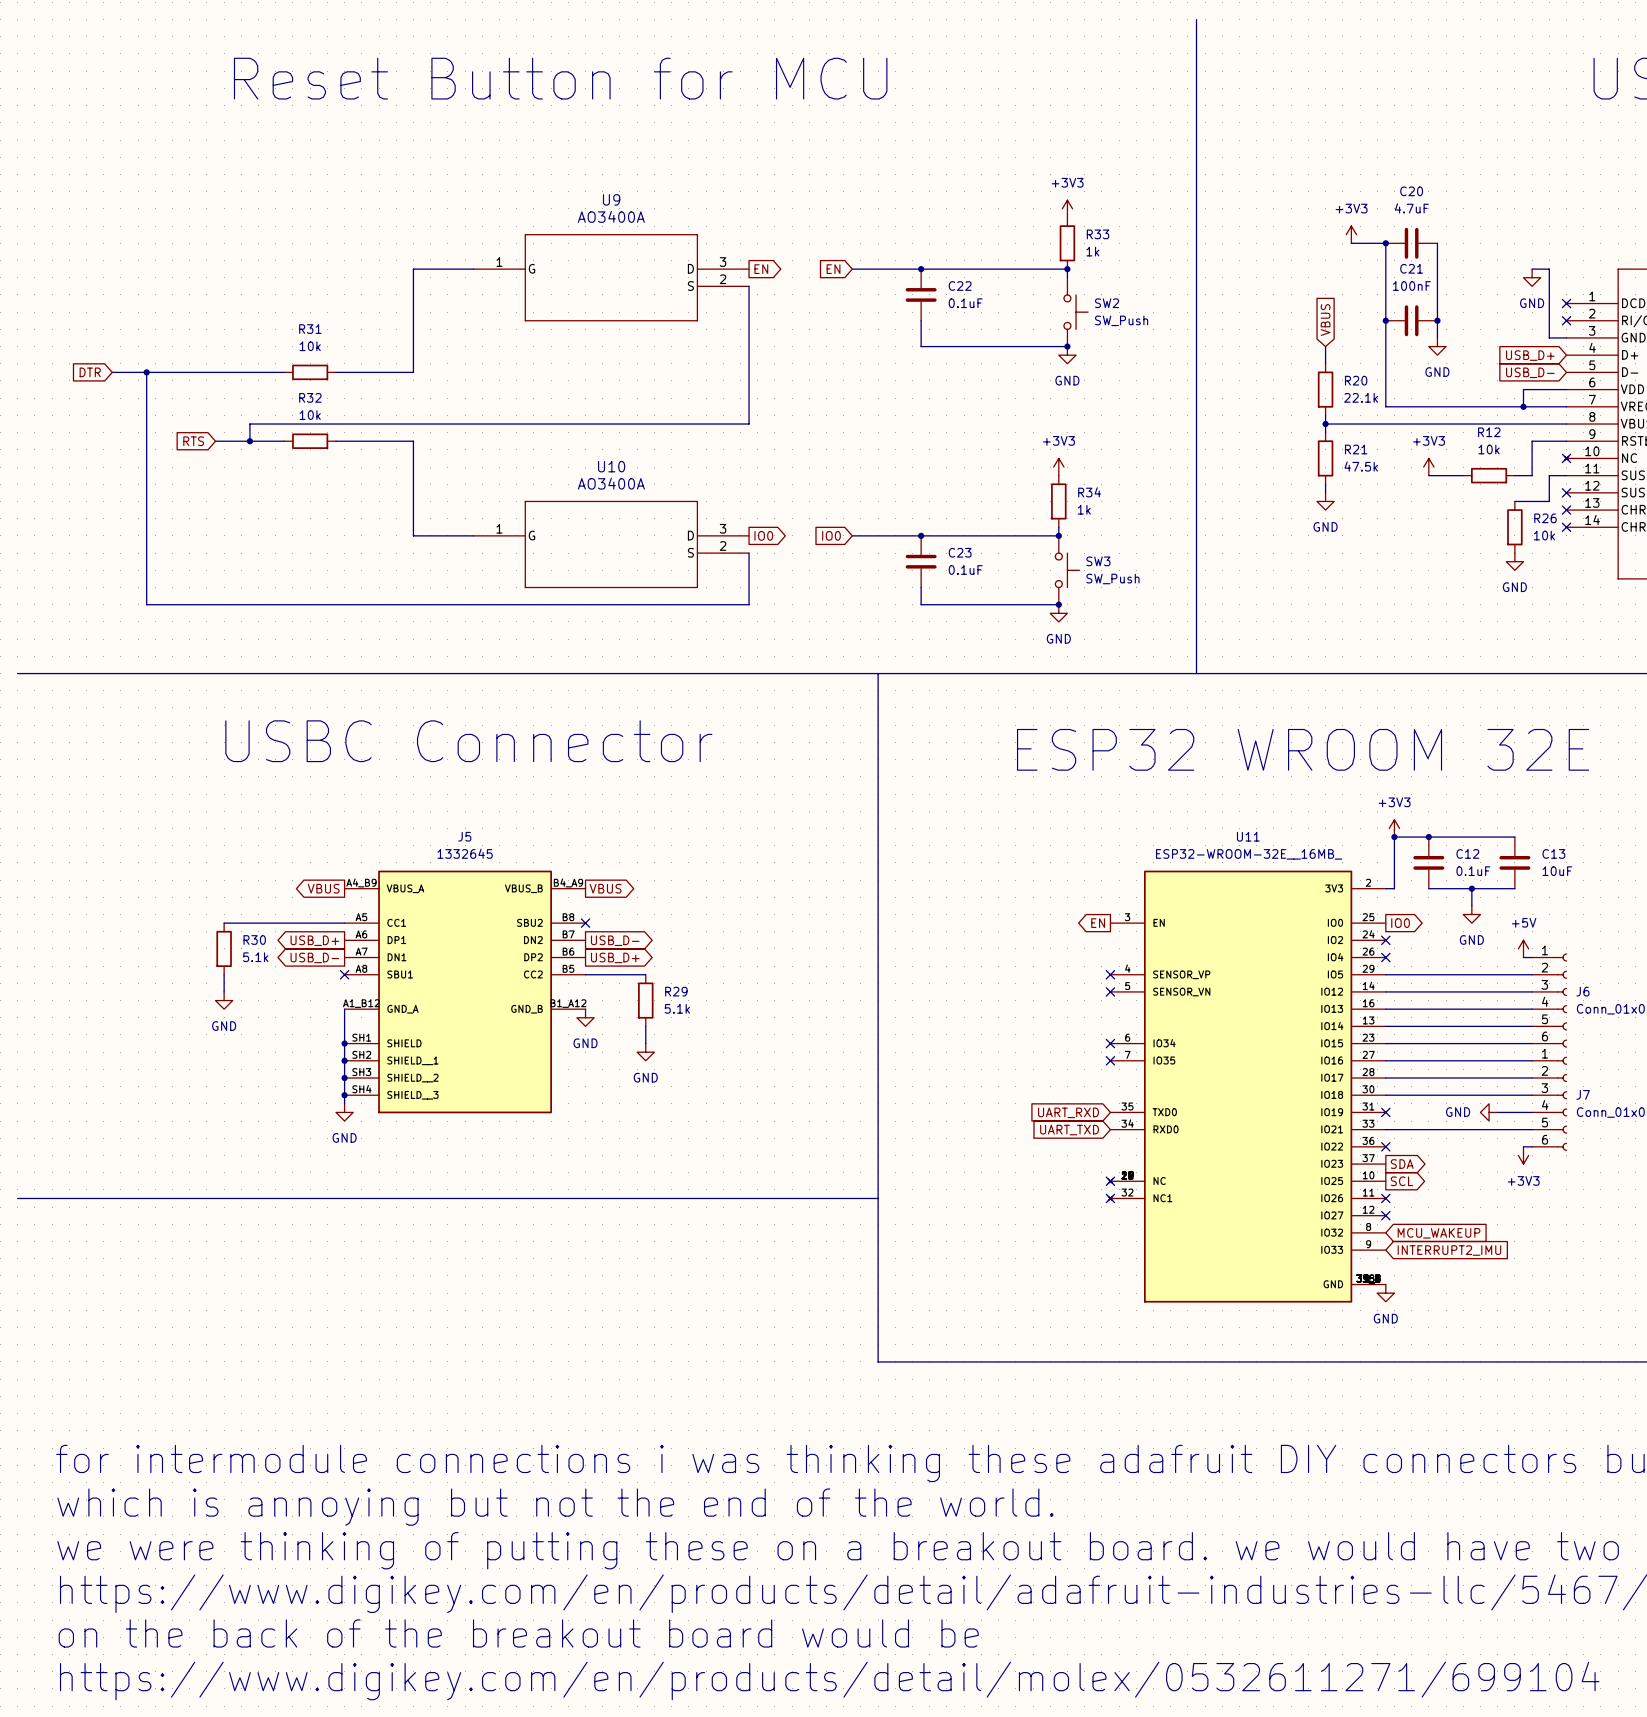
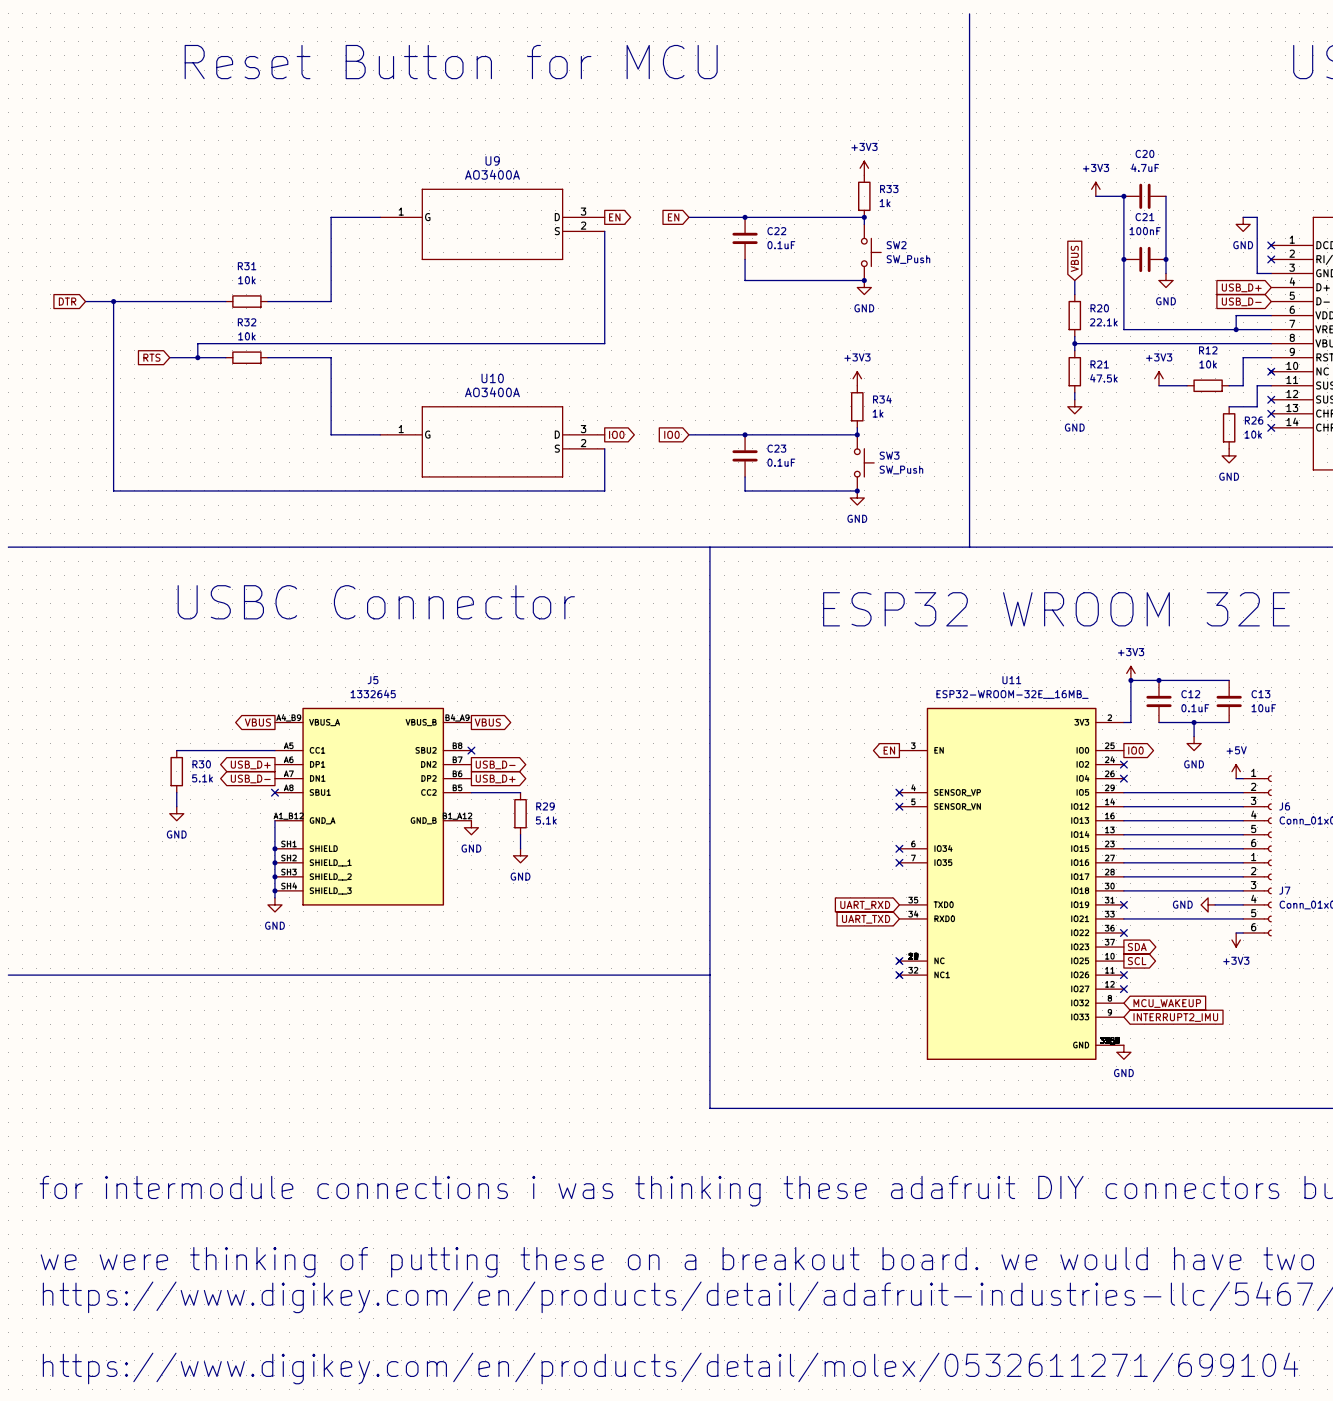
text: which is annoying but not the end of the world. (555, 1507) -> none
text: on the back of the breakout board would be (518, 1633) -> none

